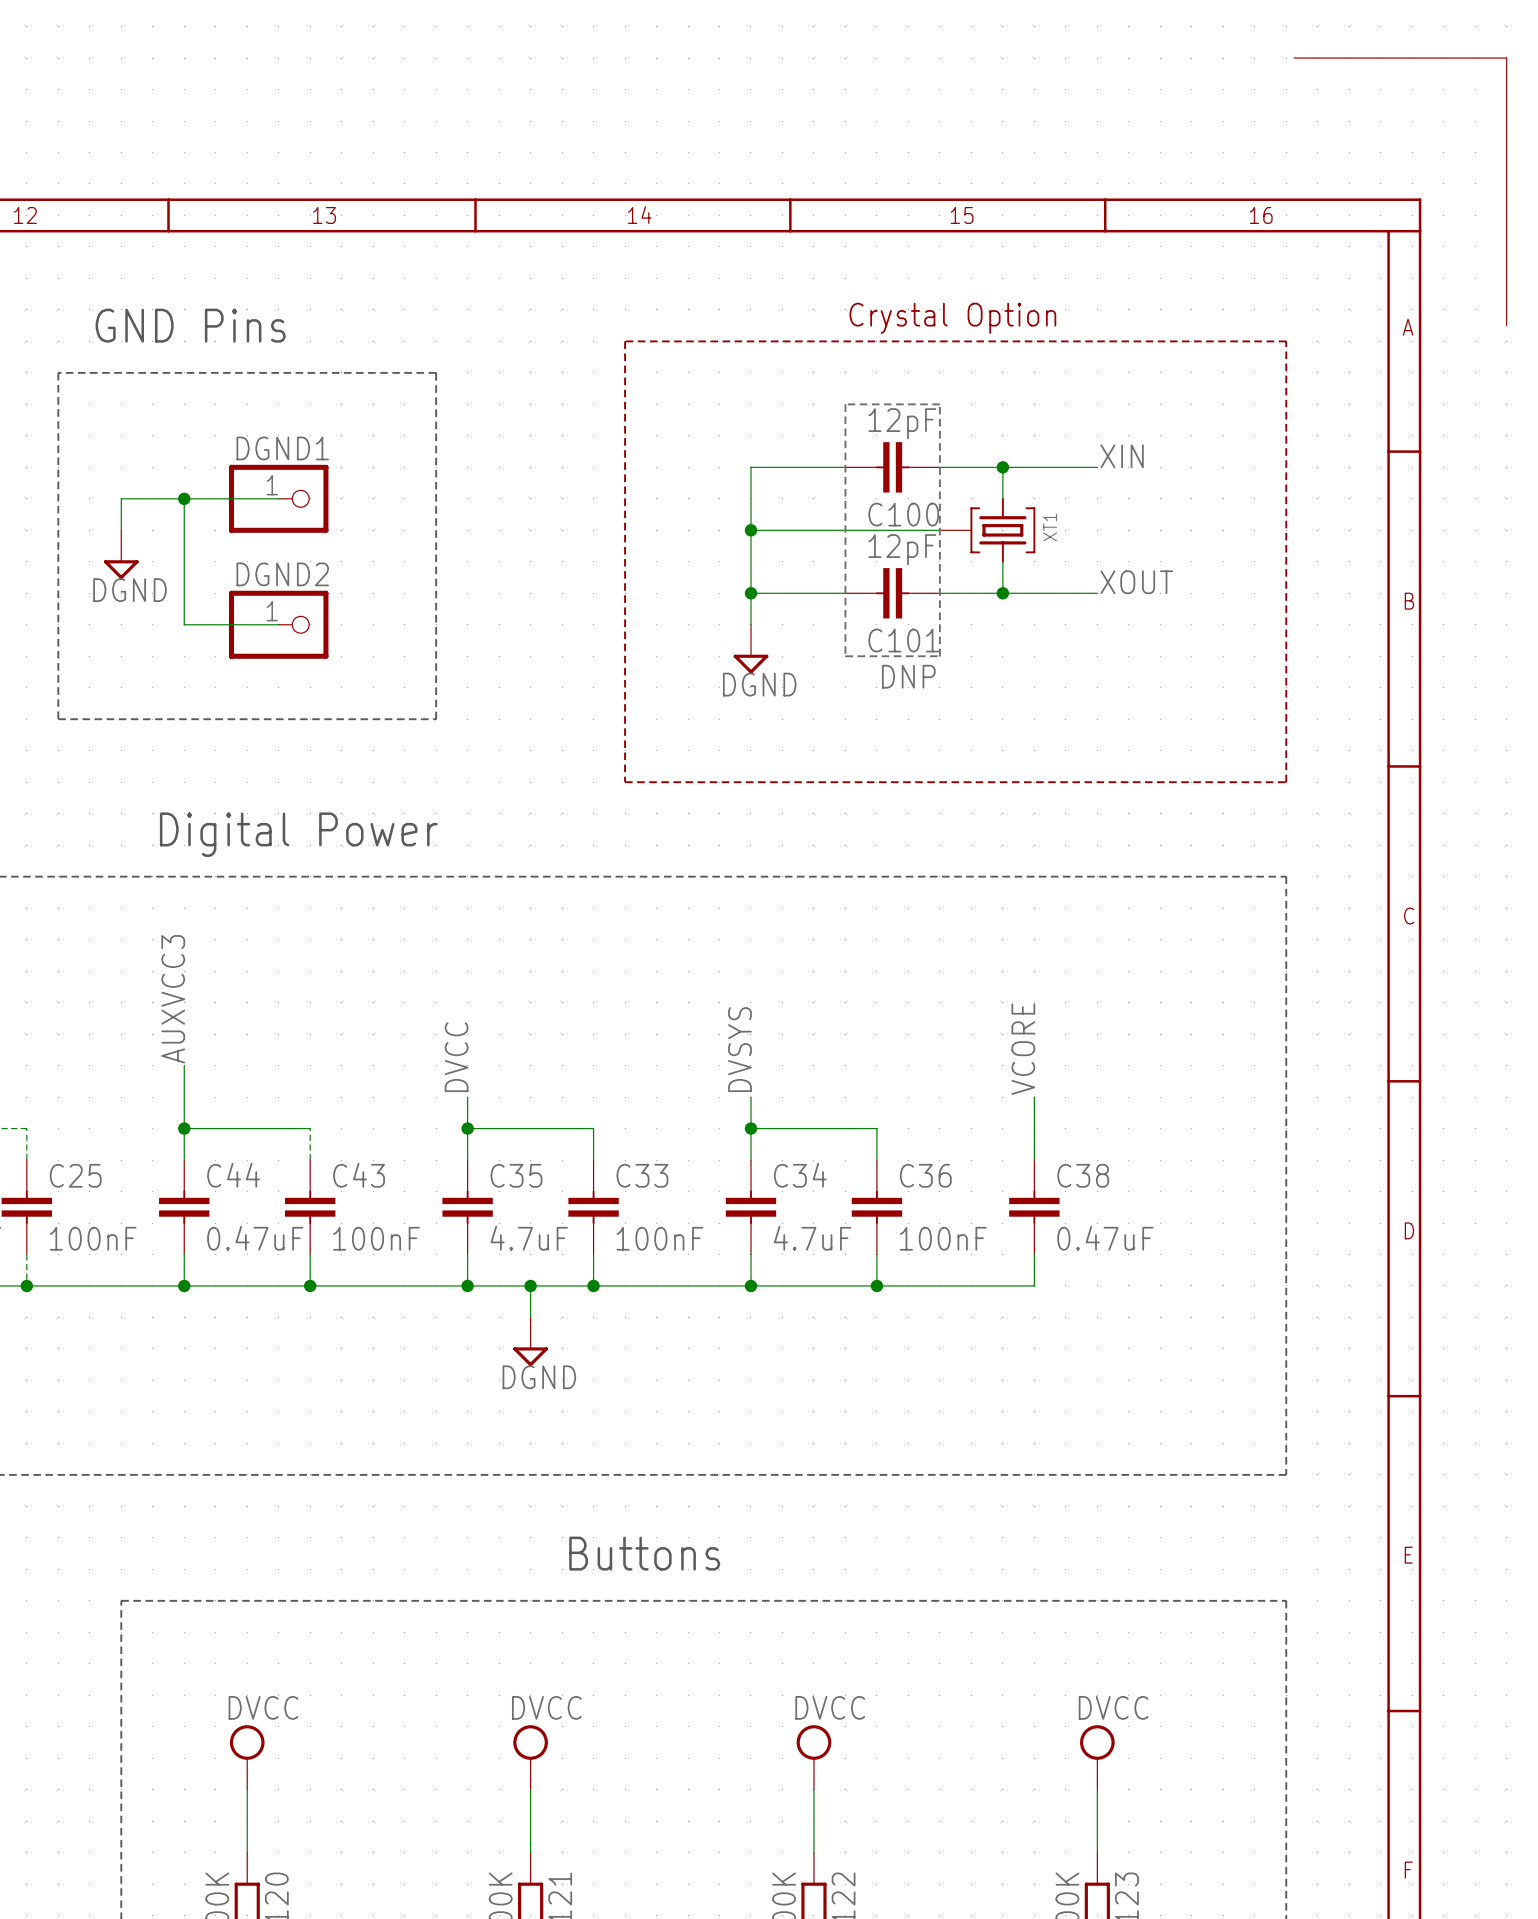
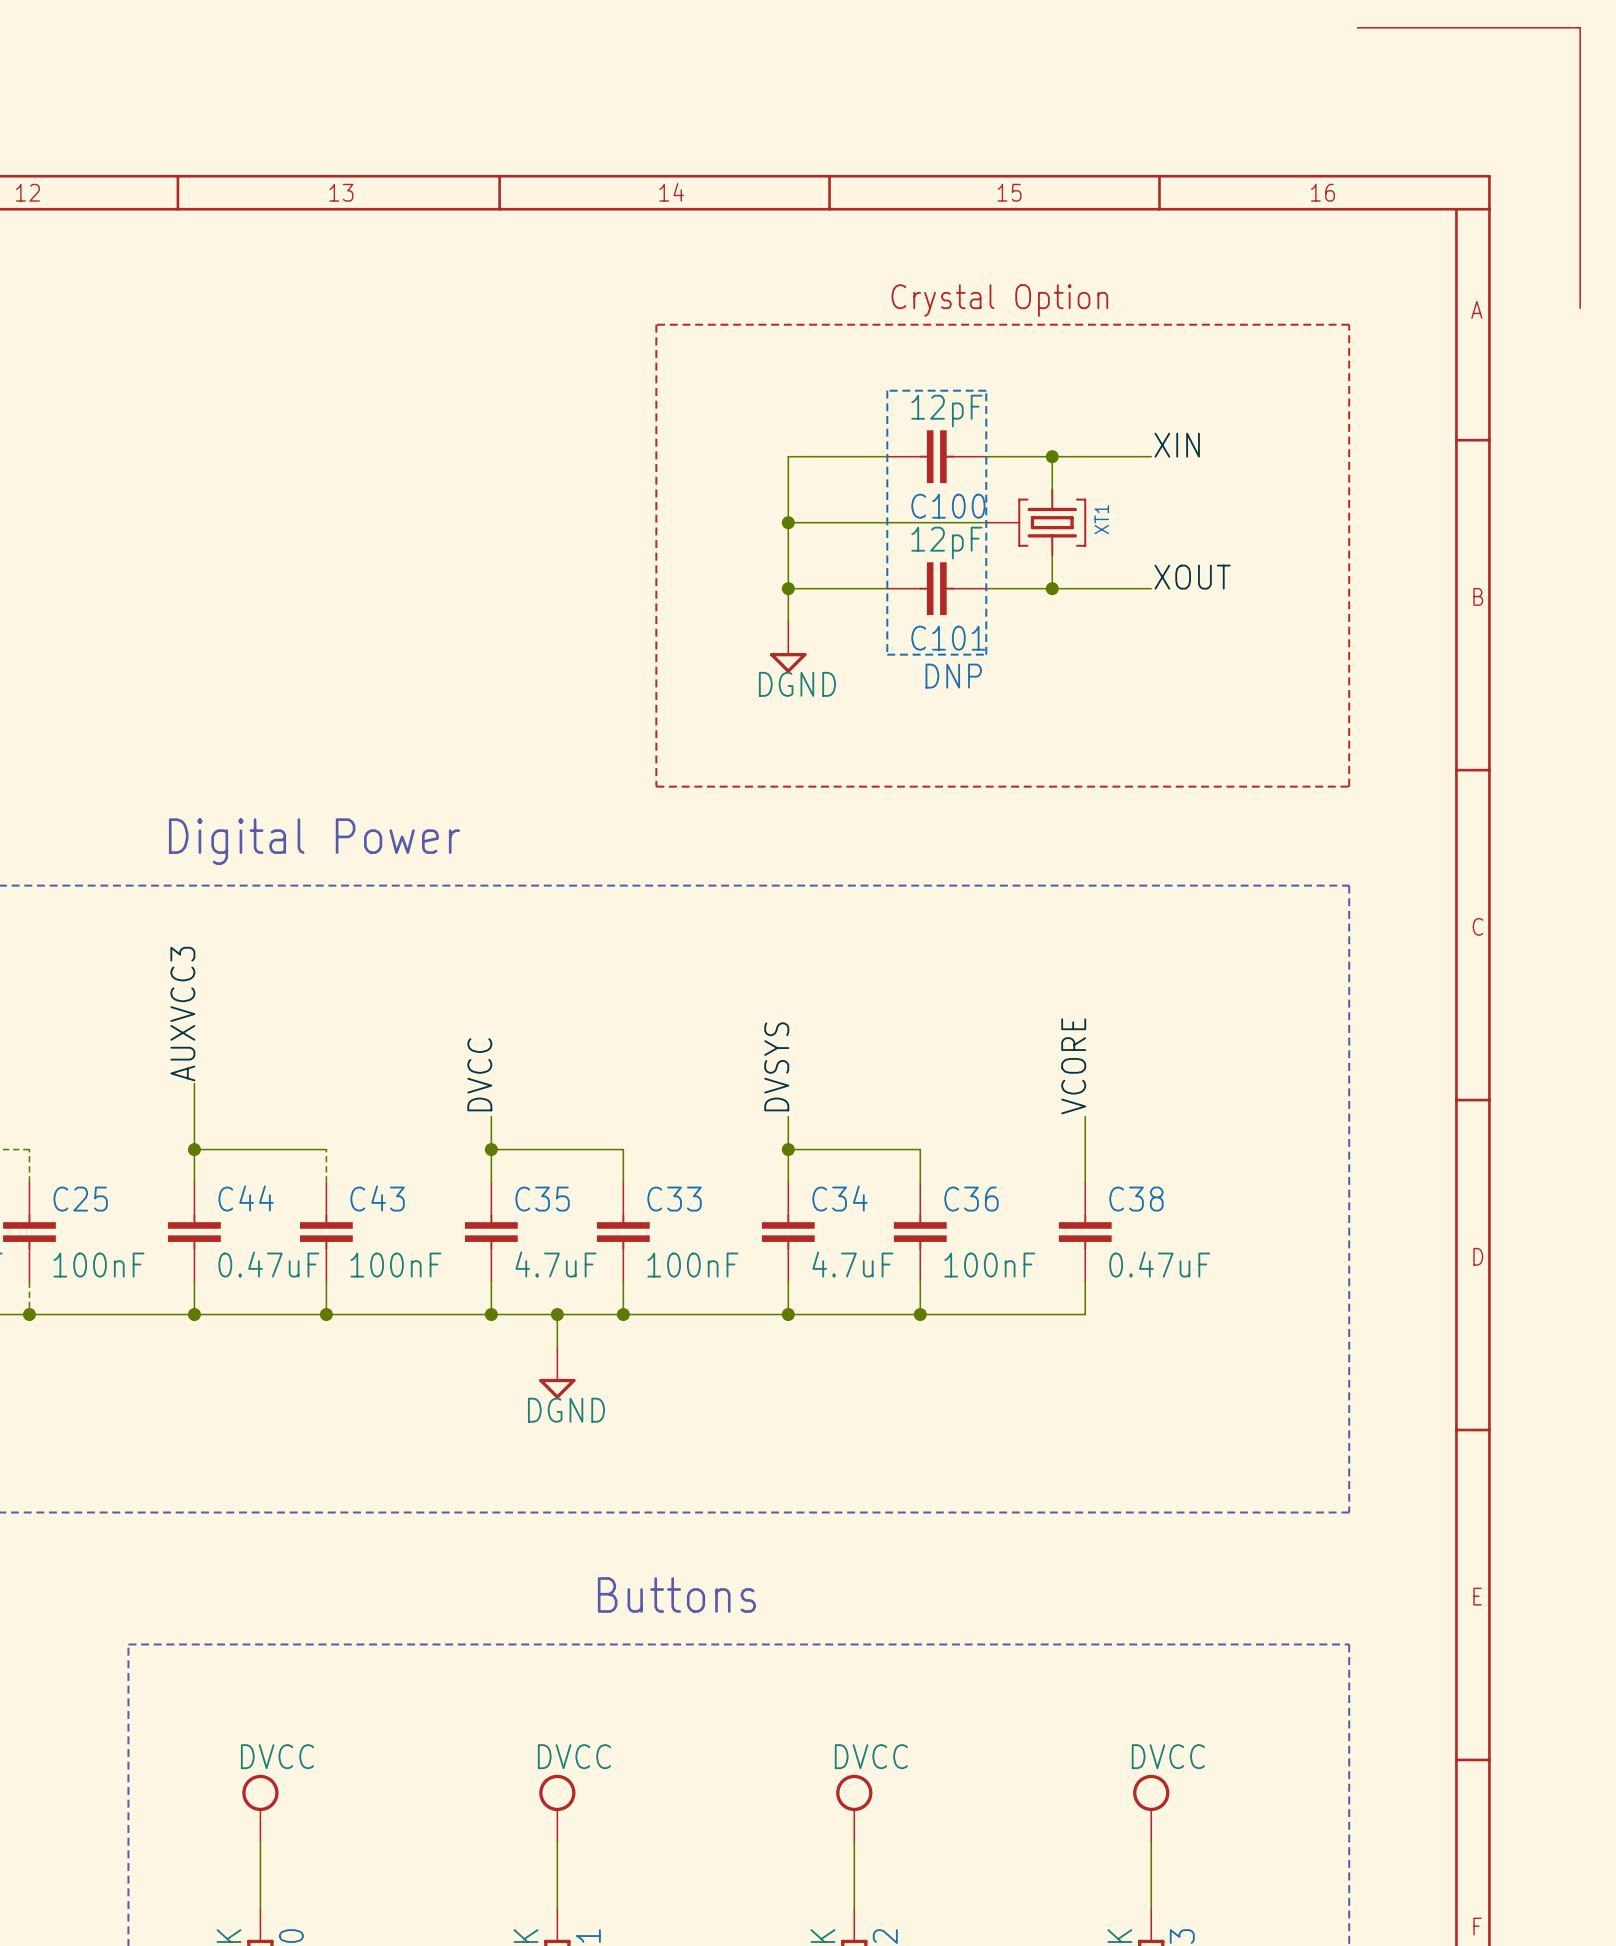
text: GND Pins (190, 325) -> none
line: (58, 372) (436, 372) (436, 719) (58, 719) (58, 372) -> none
wire: (184, 498) (184, 624) (278, 624) -> none
junction: (184, 498) -> none
wire: (278, 498) (121, 498) (121, 530) -> none
DGND1: (278, 498) -> none
power symbol: DGND (121, 554) -> none
DGND2: (278, 624) -> none

